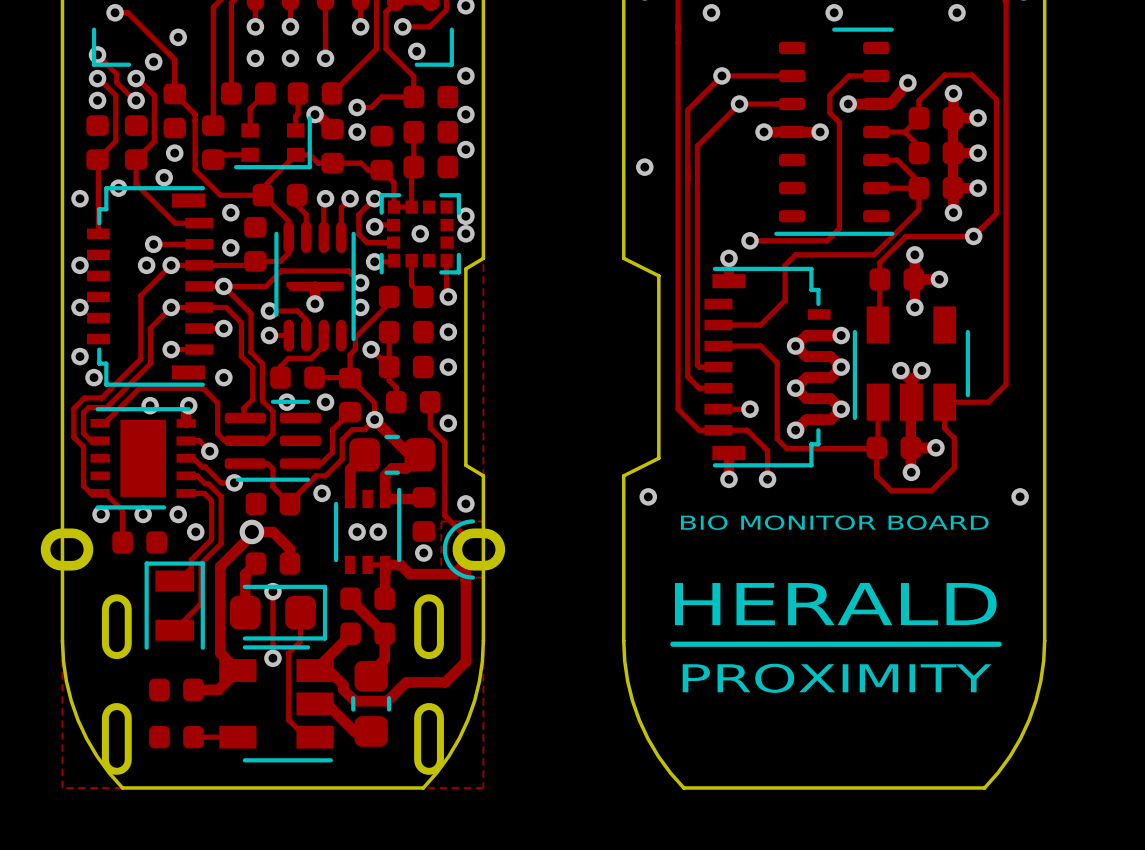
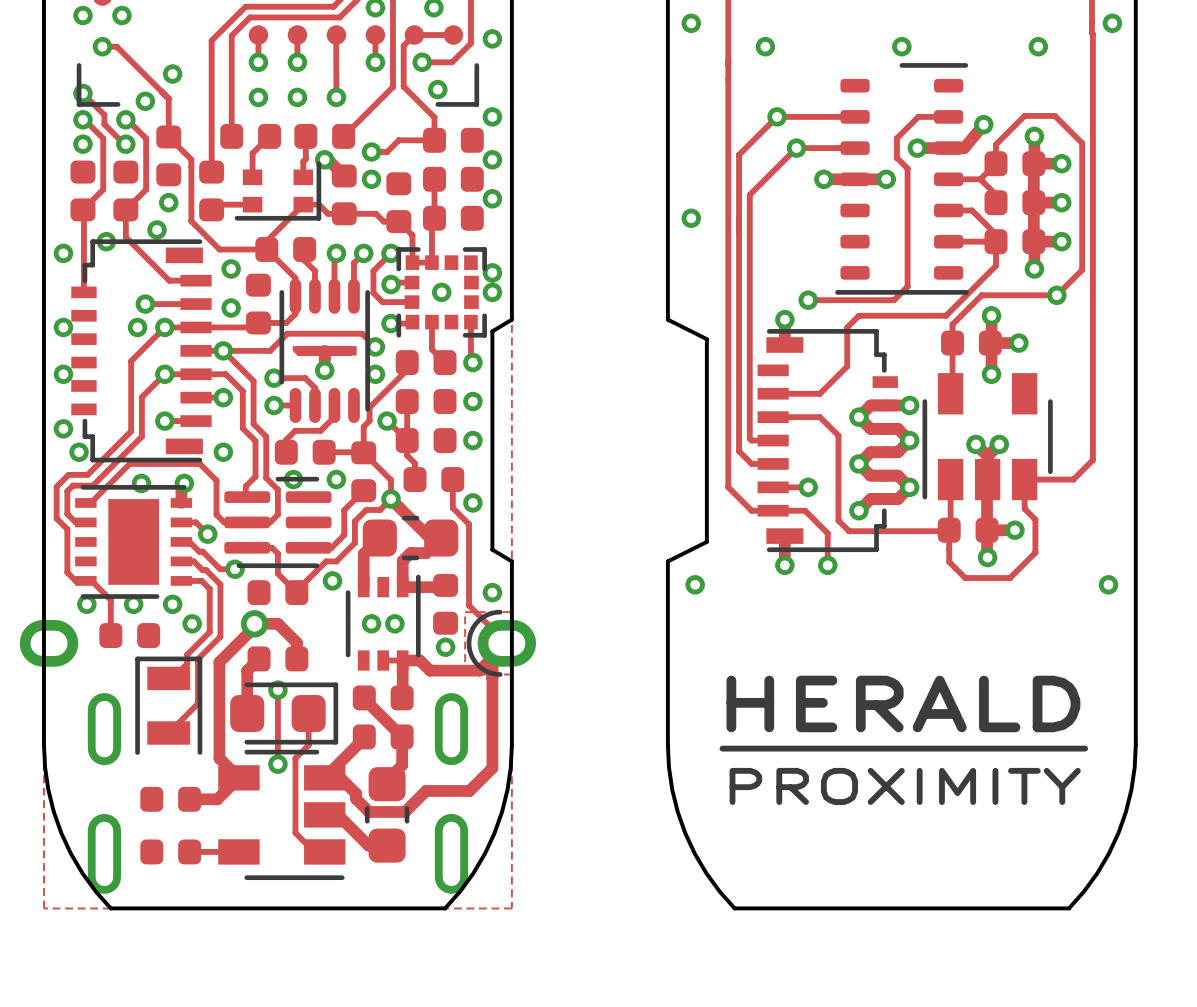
text: BIO MONITOR BOARD (834, 522) -> none

